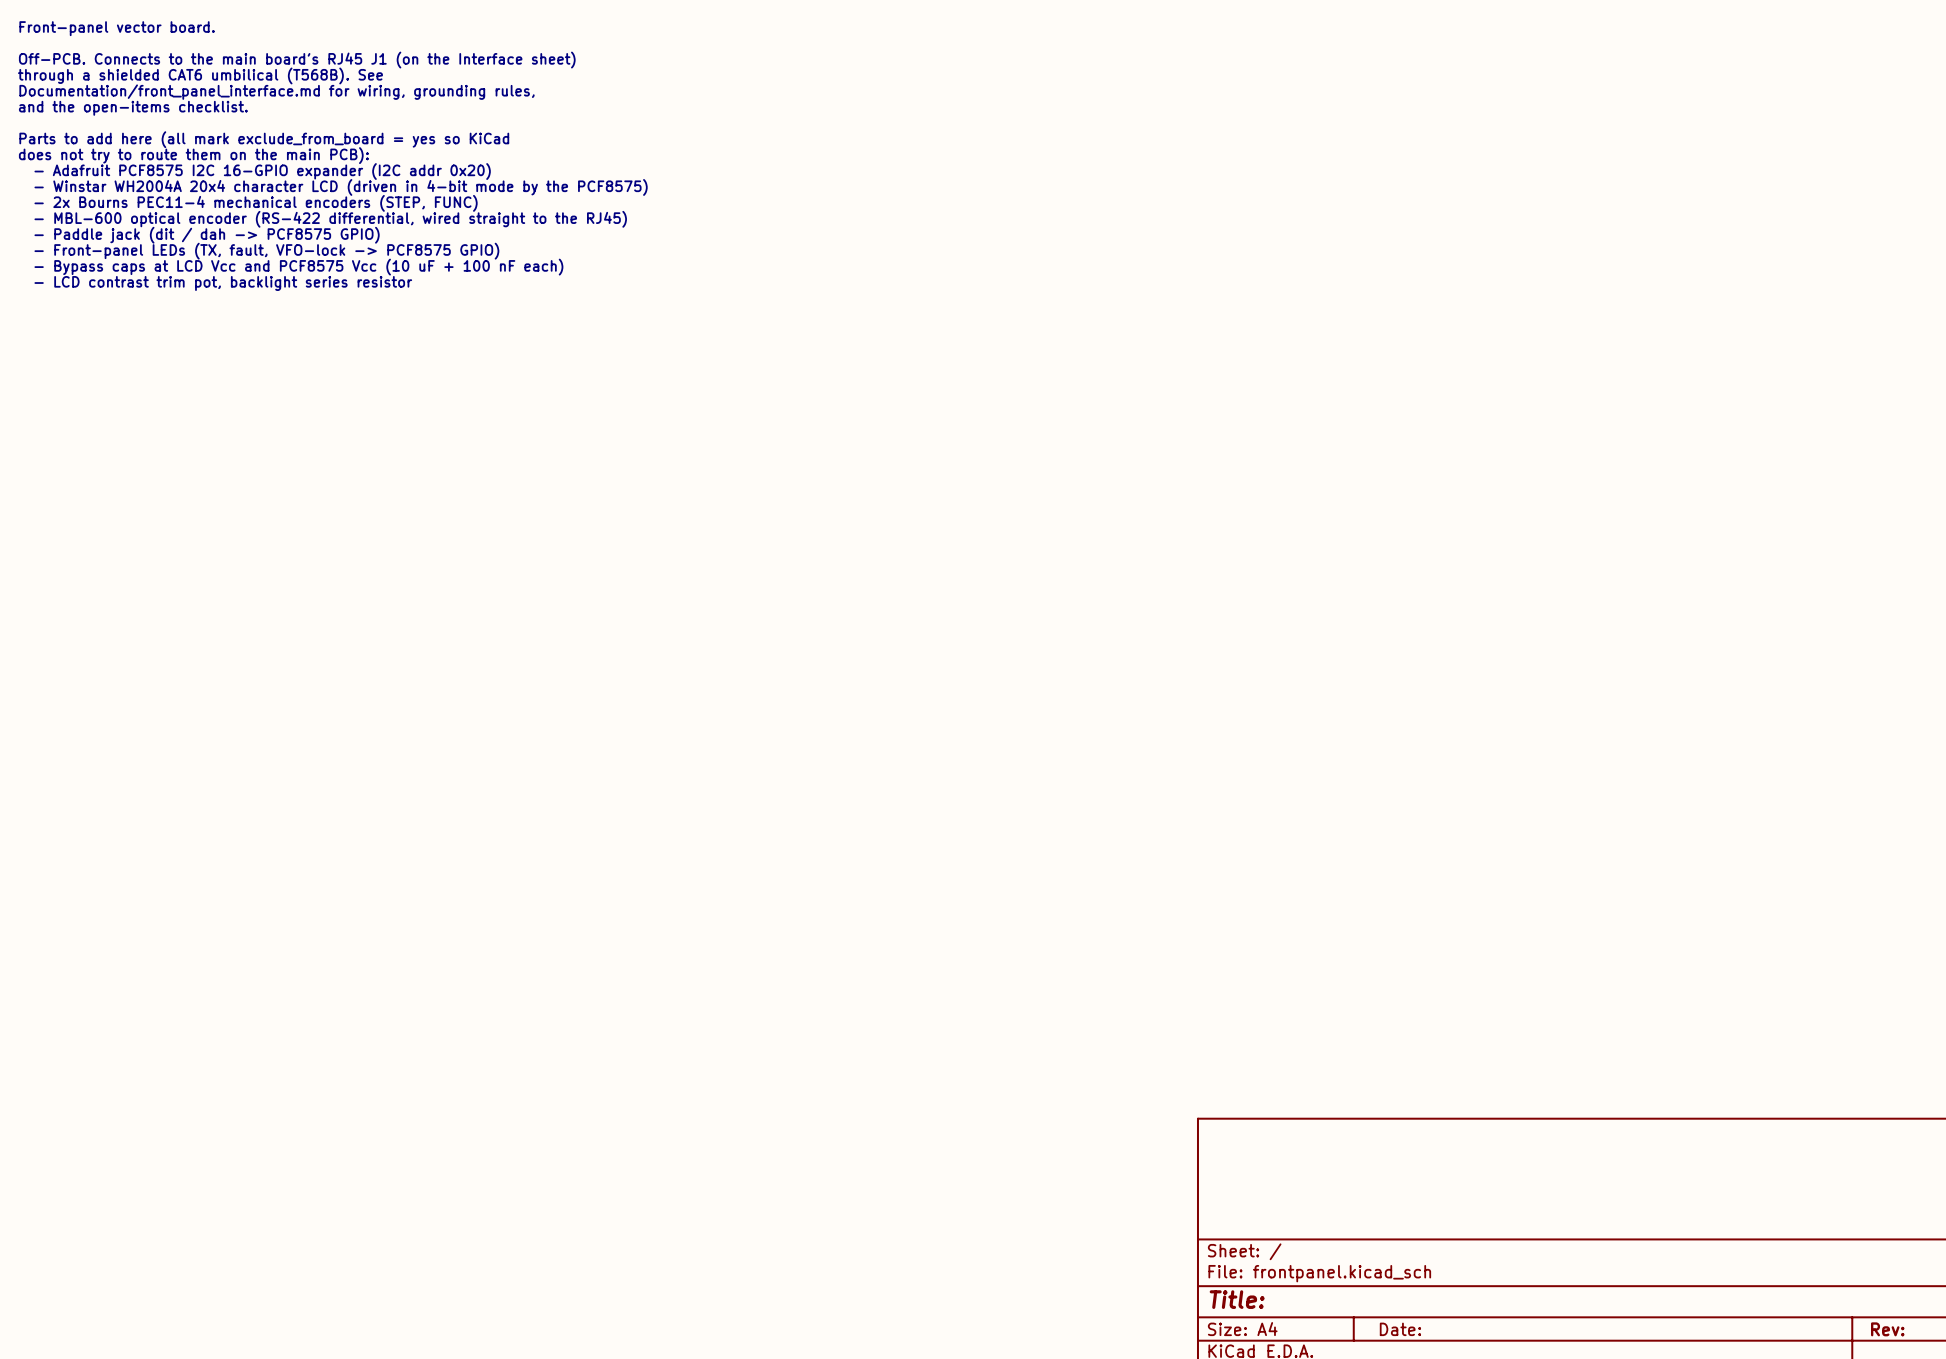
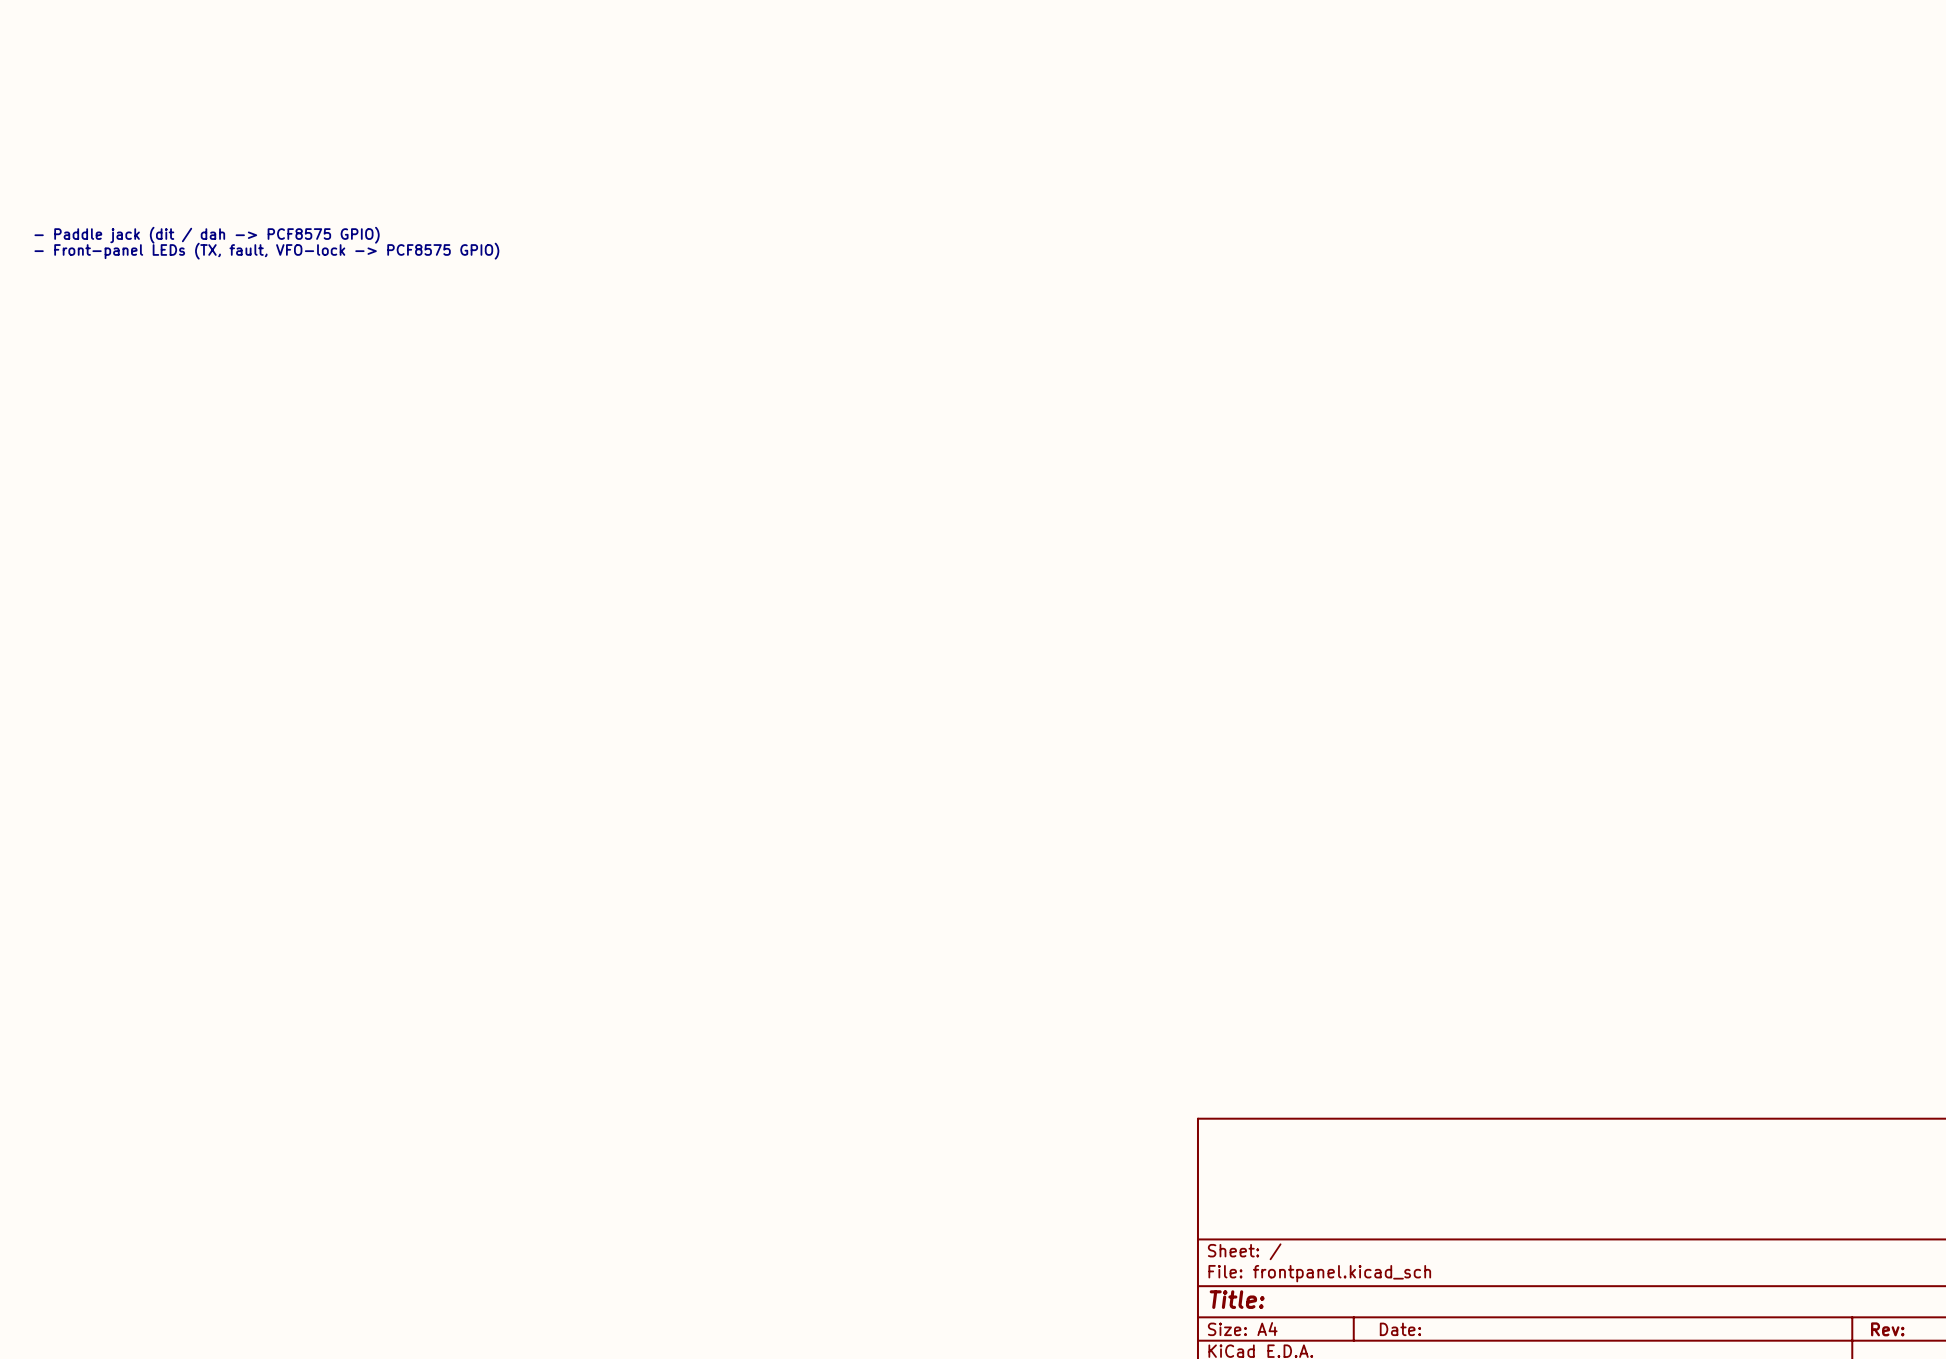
text: Front-panel vector board. (117, 28) -> none
text: Off-PCB. Connects to the main board's RJ45 J1 (on the Interface sheet) (297, 60) -> none
text: through a shielded CAT6 umbilical (T568B). See (200, 75) -> none
text: Documentation/front_panel_interface.md for wiring, grounding rules, (277, 92) -> none
text: and the open-items checklist. (133, 108) -> none
text: Parts to add here (all mark exclude_from_board = yes so KiCad (264, 139) -> none
text: does not try to route them on the main PCB): (193, 155) -> none
text: - Adafruit PCF8575 I2C 16-GPIO expander (I2C addr 0x20) (262, 171) -> none
text: - Winstar WH2004A 20x4 character LCD (driven in 4-bit mode by the PCF8575) (341, 187) -> none
text: - 2x Bourns PEC11-4 mechanical encoders (STEP, FUNC) (256, 203) -> none
text: - MBL-600 optical encoder (RS-422 differential, wired straight to the RJ45) (330, 219) -> none
text: - Bypass caps at LCD Vcc and PCF8575 Vcc (10 uF + 100 nF each) (298, 267) -> none
text: - LCD contrast trim pot, backlight series resistor (223, 283) -> none

